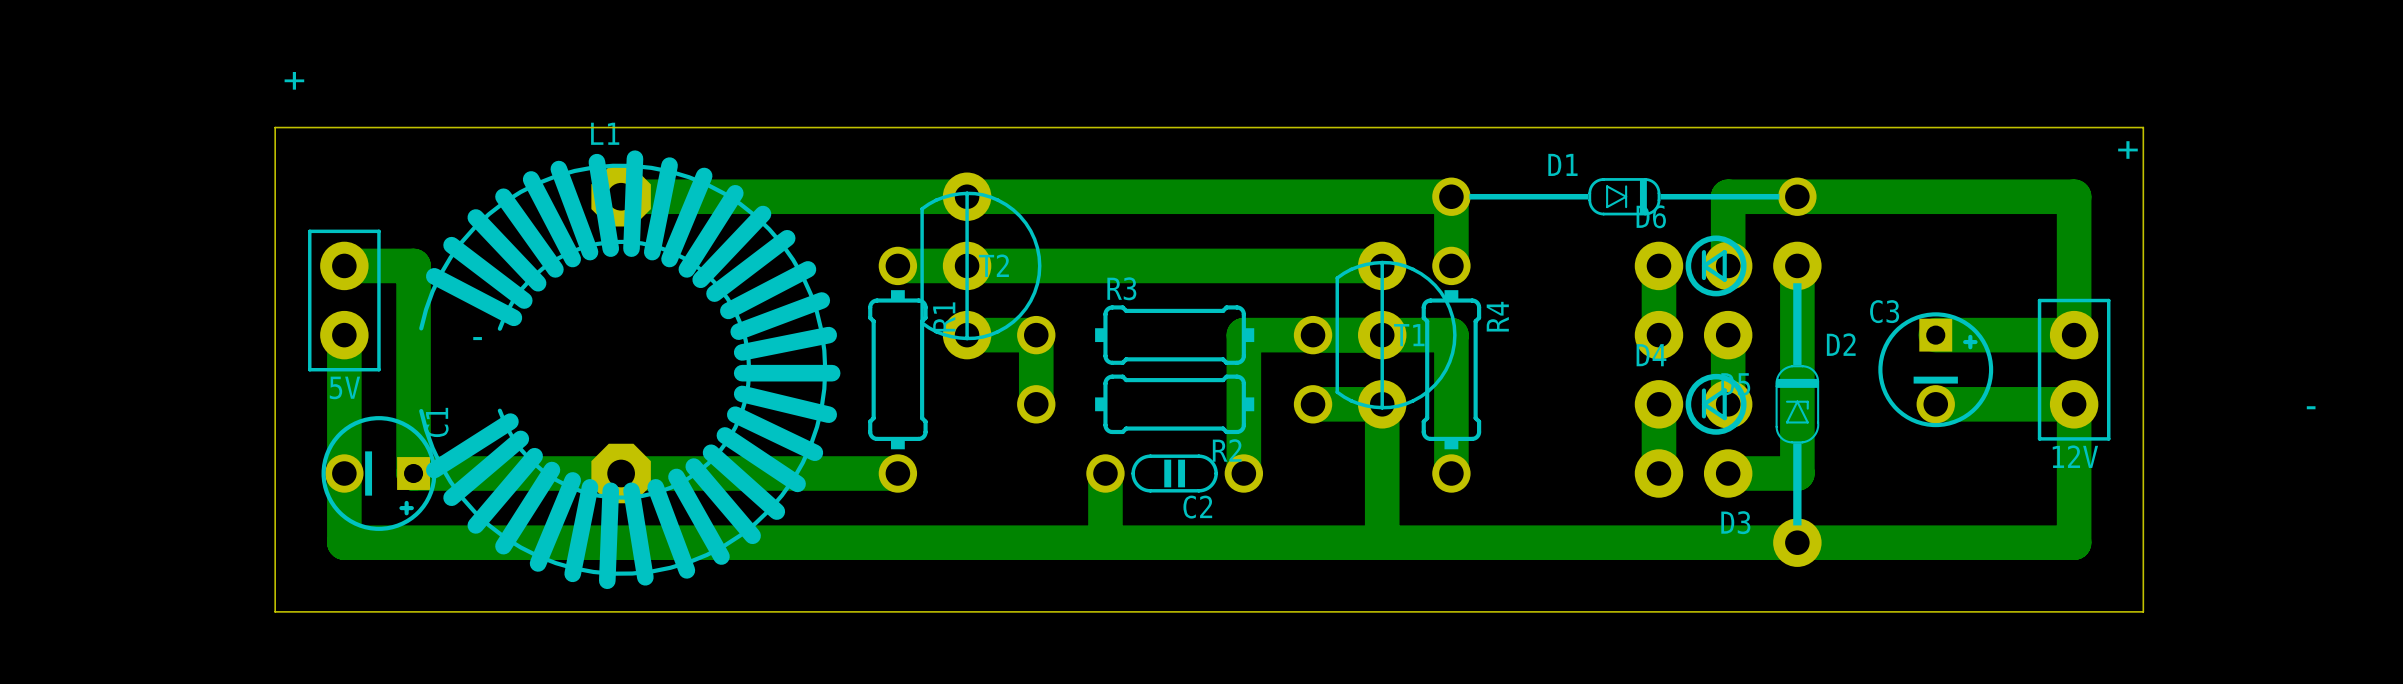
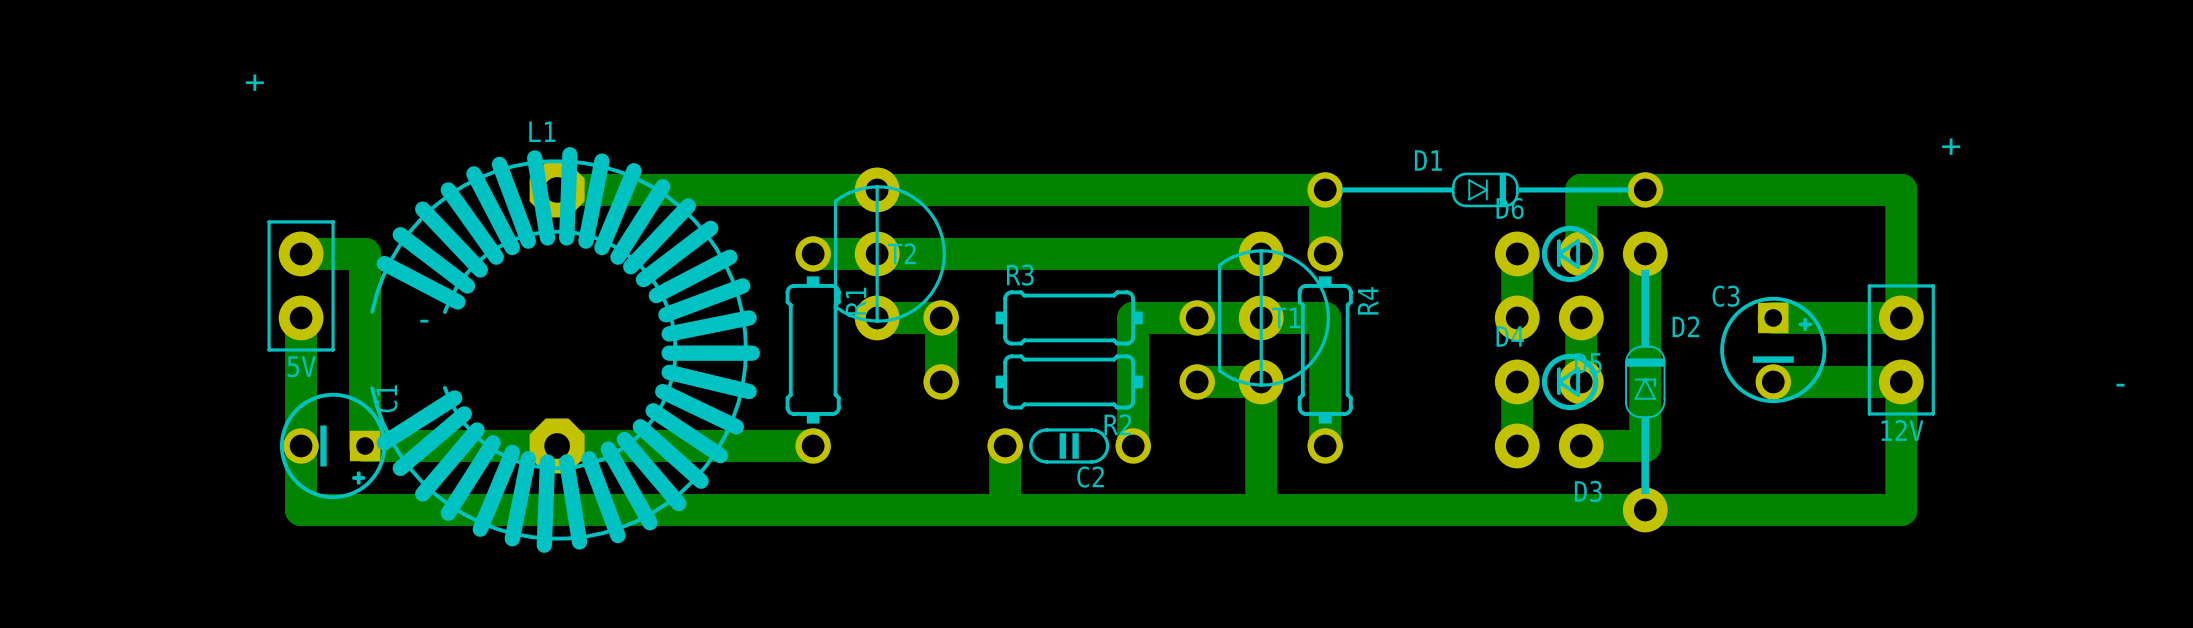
board edge: (275, 127) (2143, 127) (2143, 611) (275, 611) (275, 127) -> none

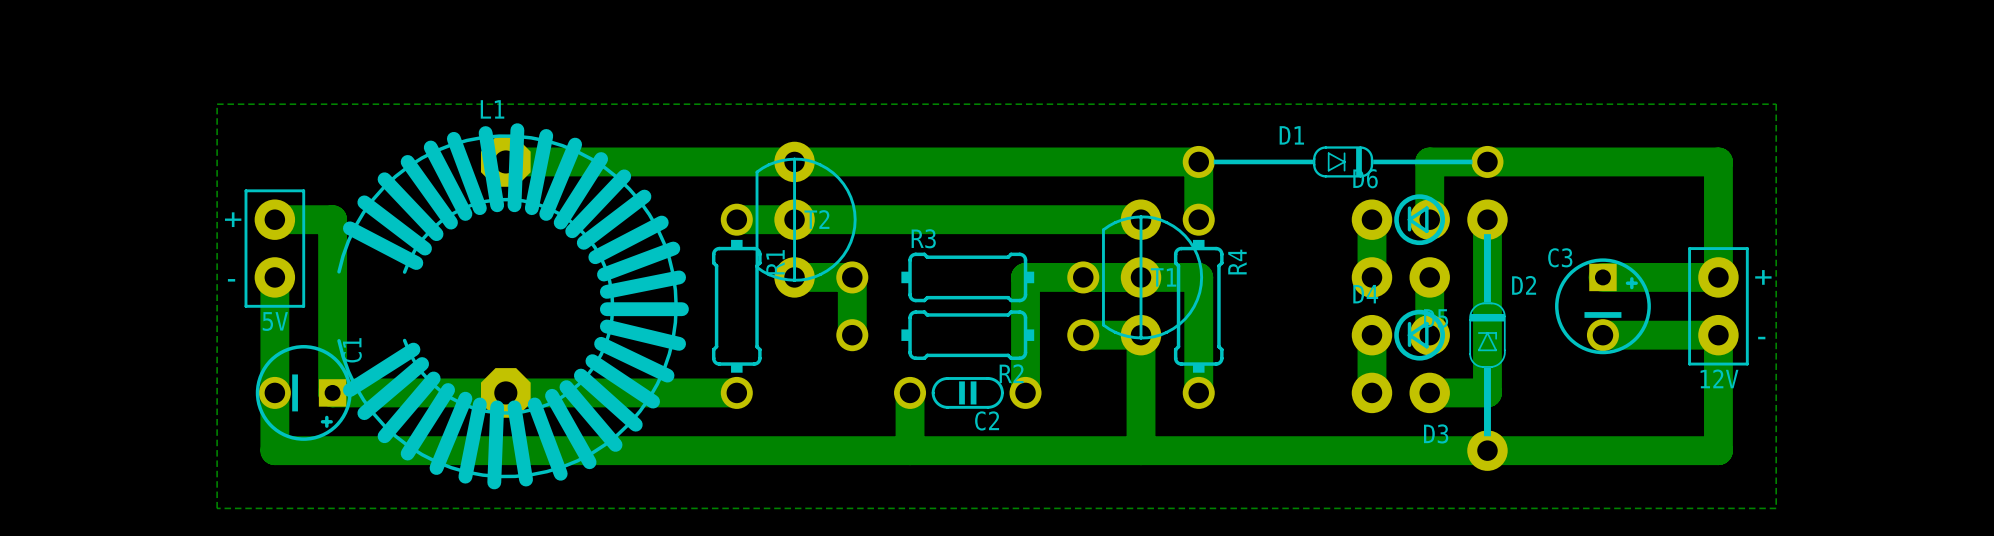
bottom zone outline: none -> (217, 104) (1776, 104) (1776, 508) (217, 508) (217, 104)
5V footprint: [267, 220, 335, 352] -> [244, 189, 306, 308]
12V footprint: [1867, 284, 1935, 416] -> [1688, 247, 1749, 366]

